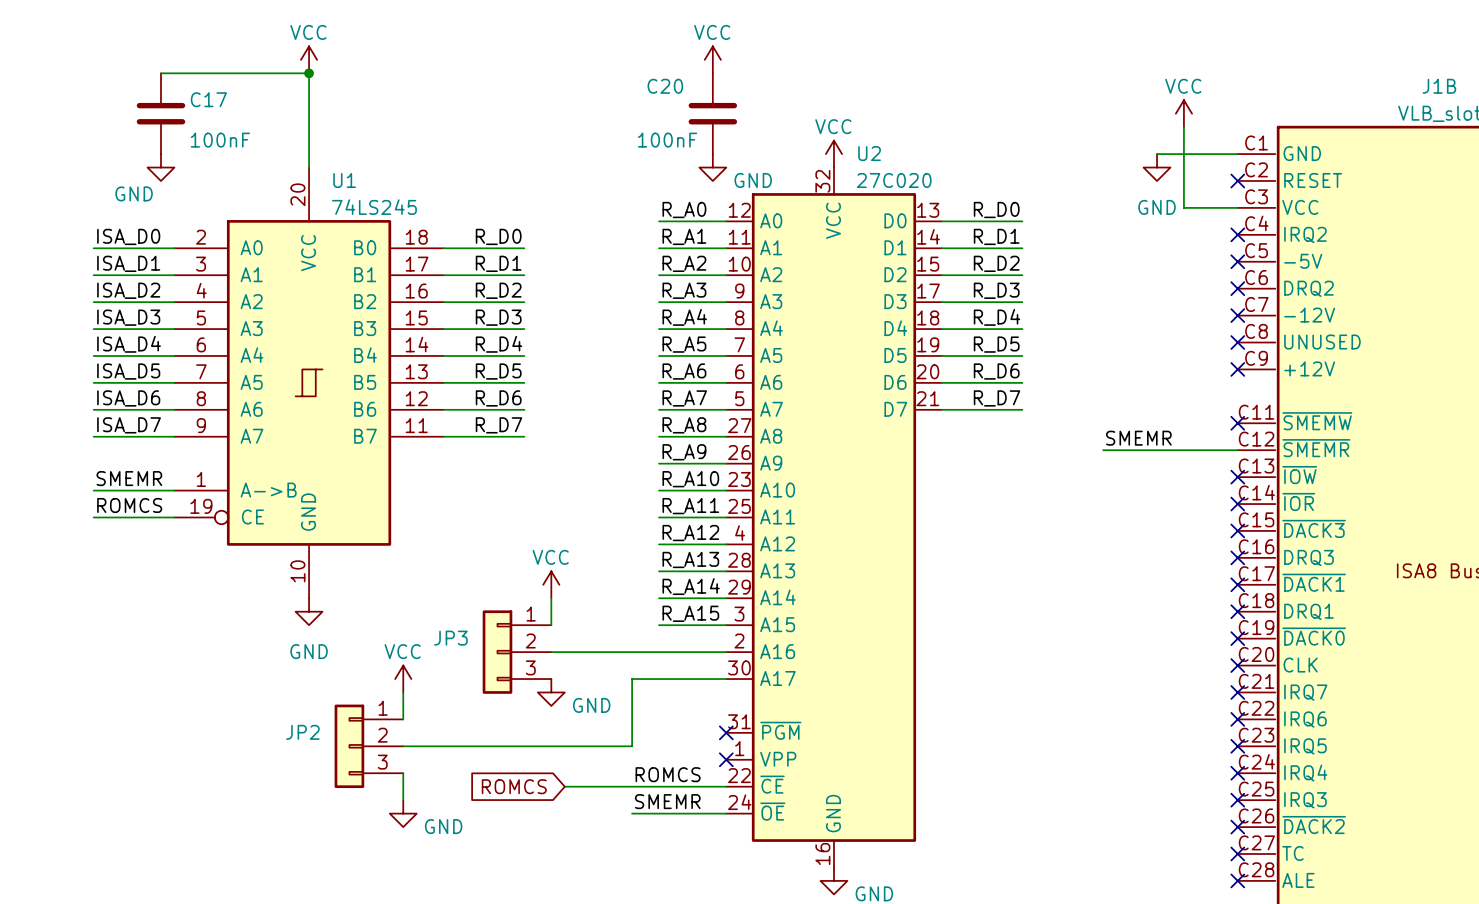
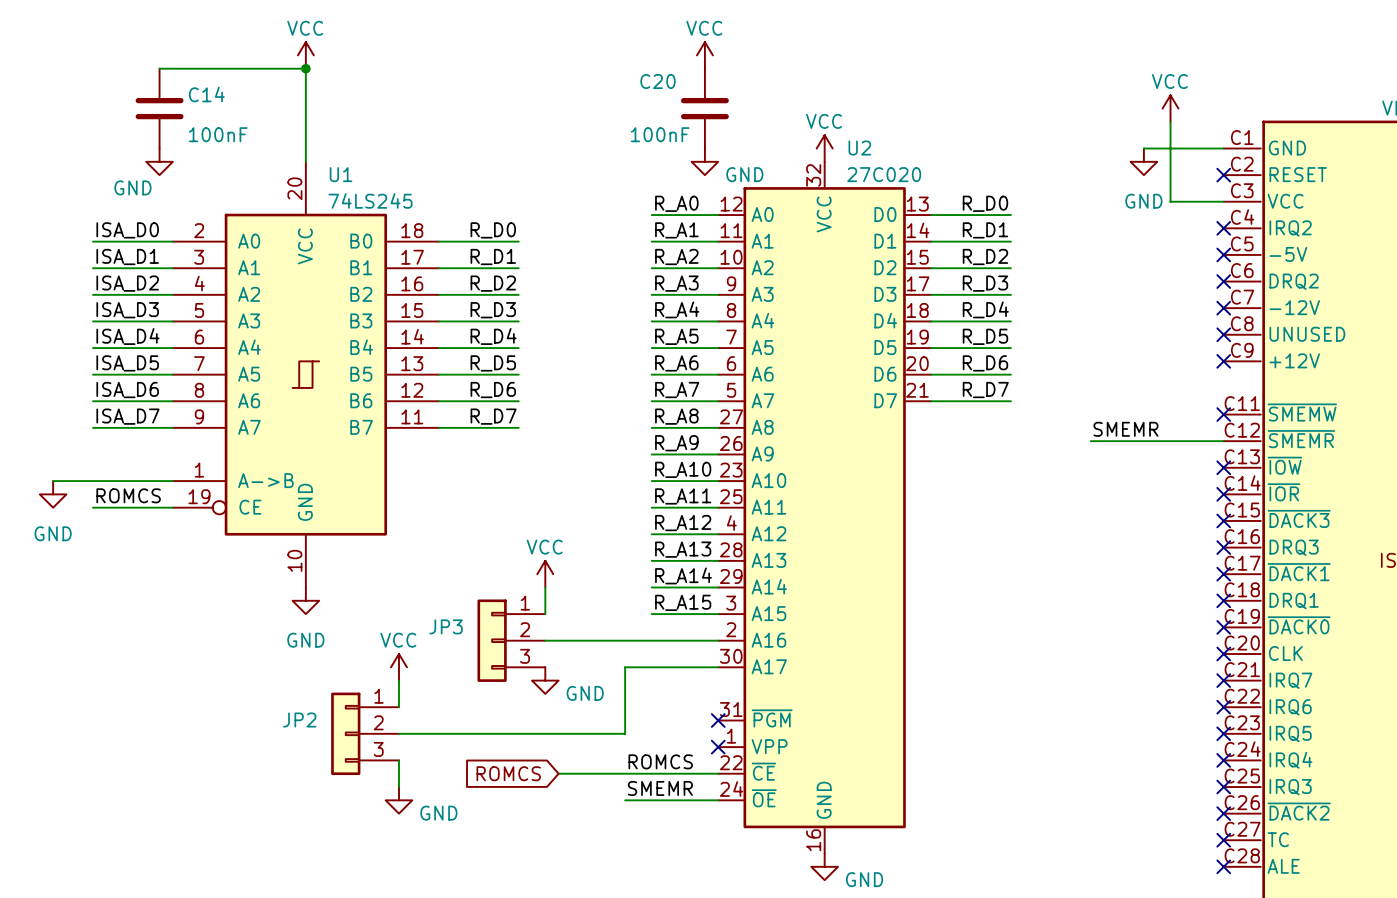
C17 name: C17 (208, 99) -> C14 (206, 94)
label: SMEMR (129, 478) -> none
wire: none -> (53, 481) (93, 481)
power symbol: none -> GND (53, 494)

